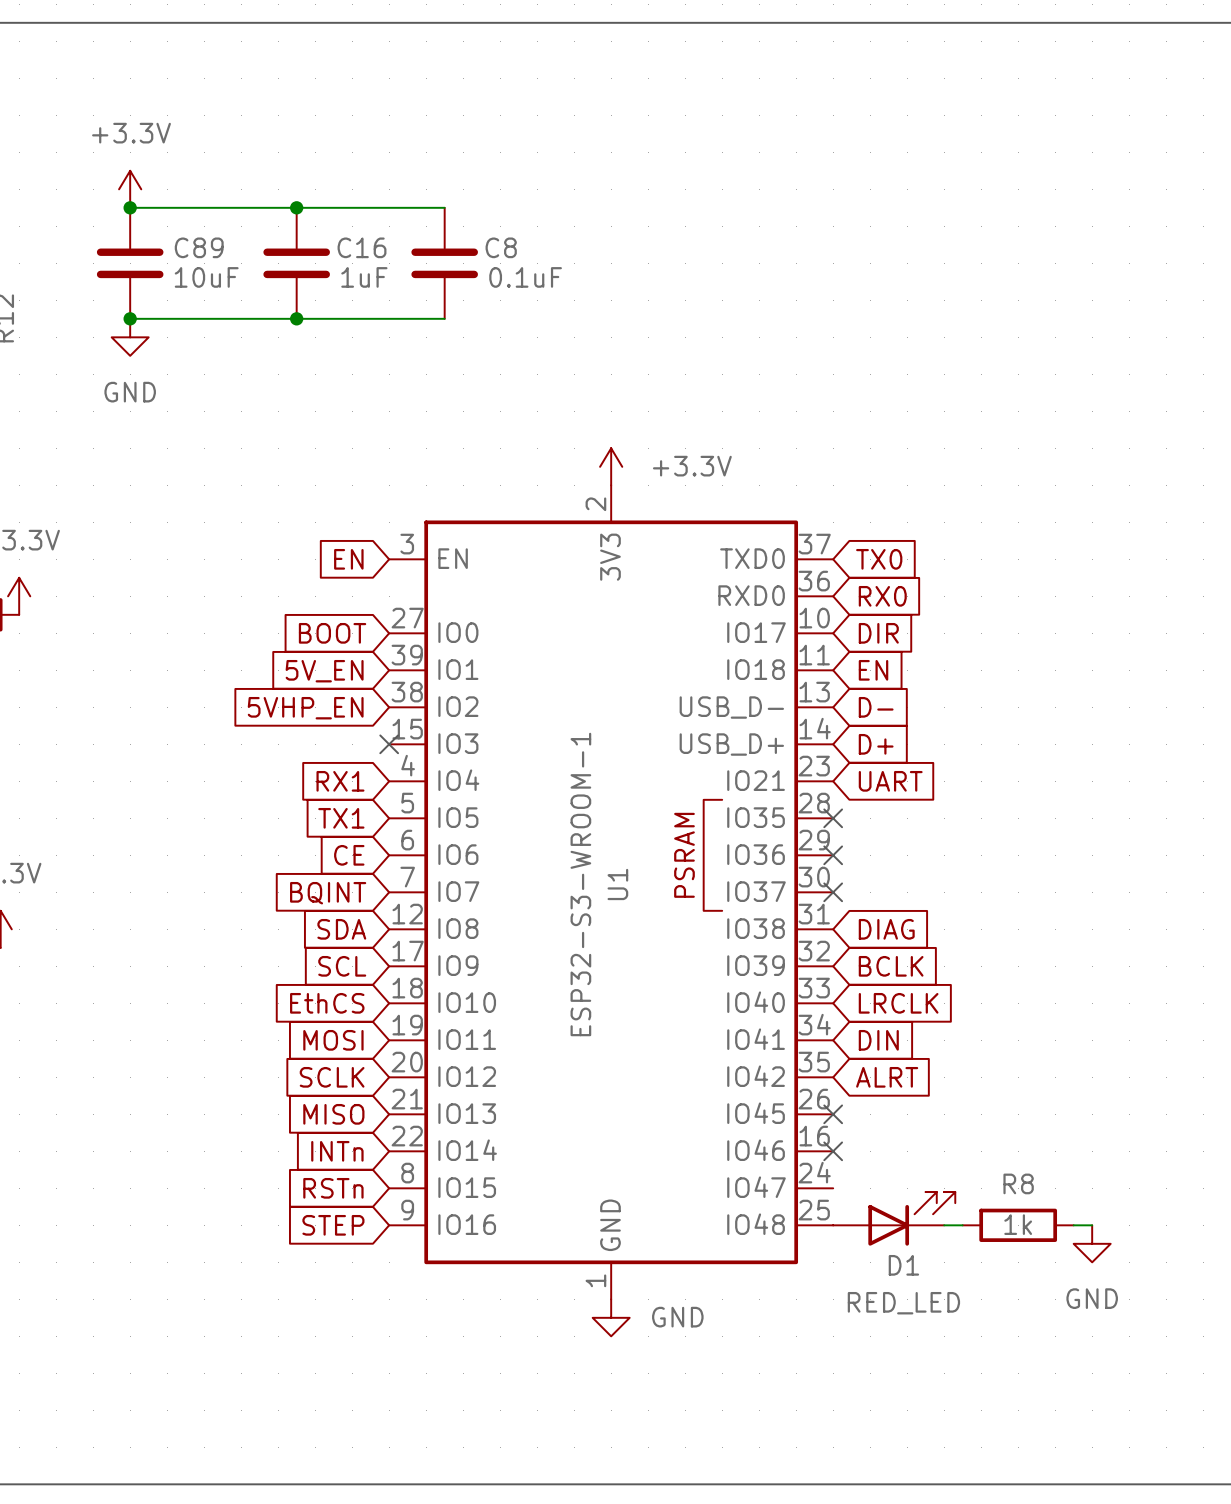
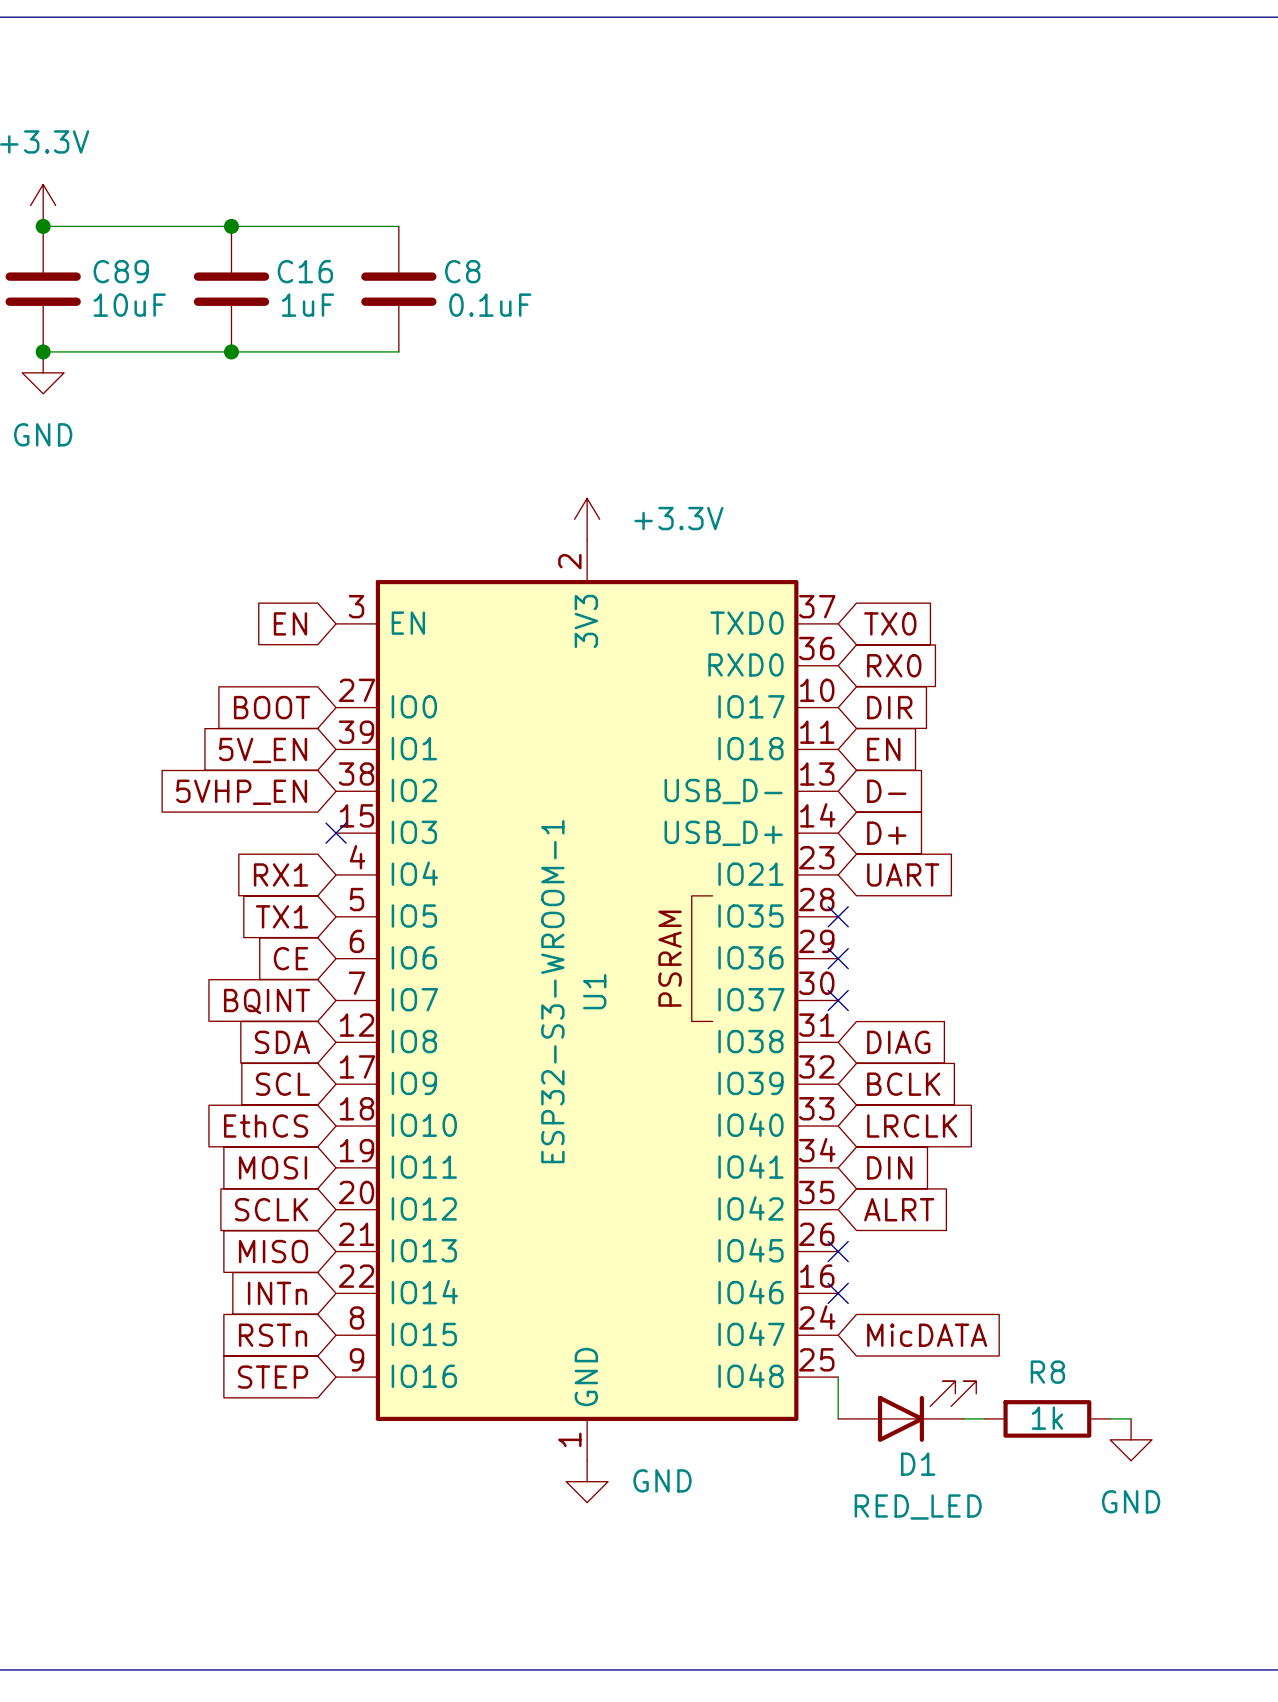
global label: none -> MicDATA (927, 1335)
D1 position: (894, 1218) -> (907, 1411)
wire: none -> (838, 1377) (838, 1418)
wire: (944, 1225) (962, 1225) -> (963, 1418) (984, 1418)
R8 position: (1018, 1225) -> (1047, 1418)
wire: (1073, 1225) (1092, 1225) -> (1110, 1418) (1131, 1418)
power symbol position: GND (1092, 1243) -> GND (1131, 1439)

